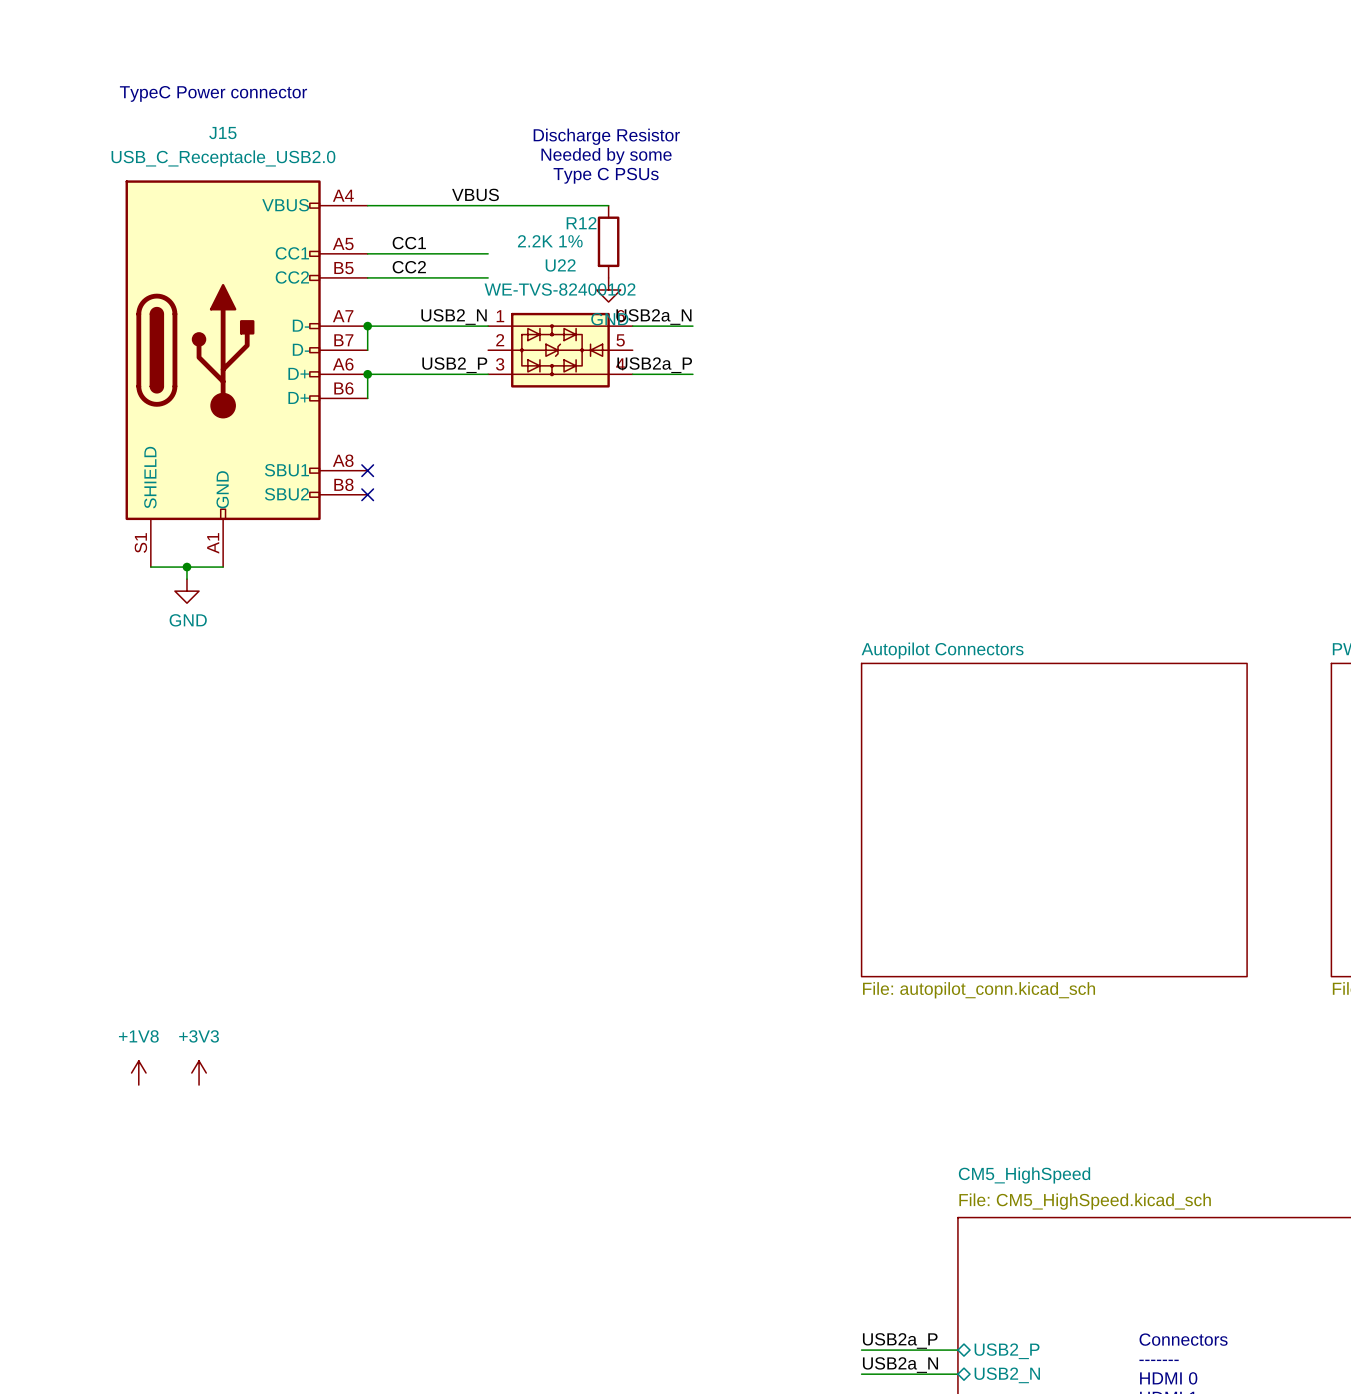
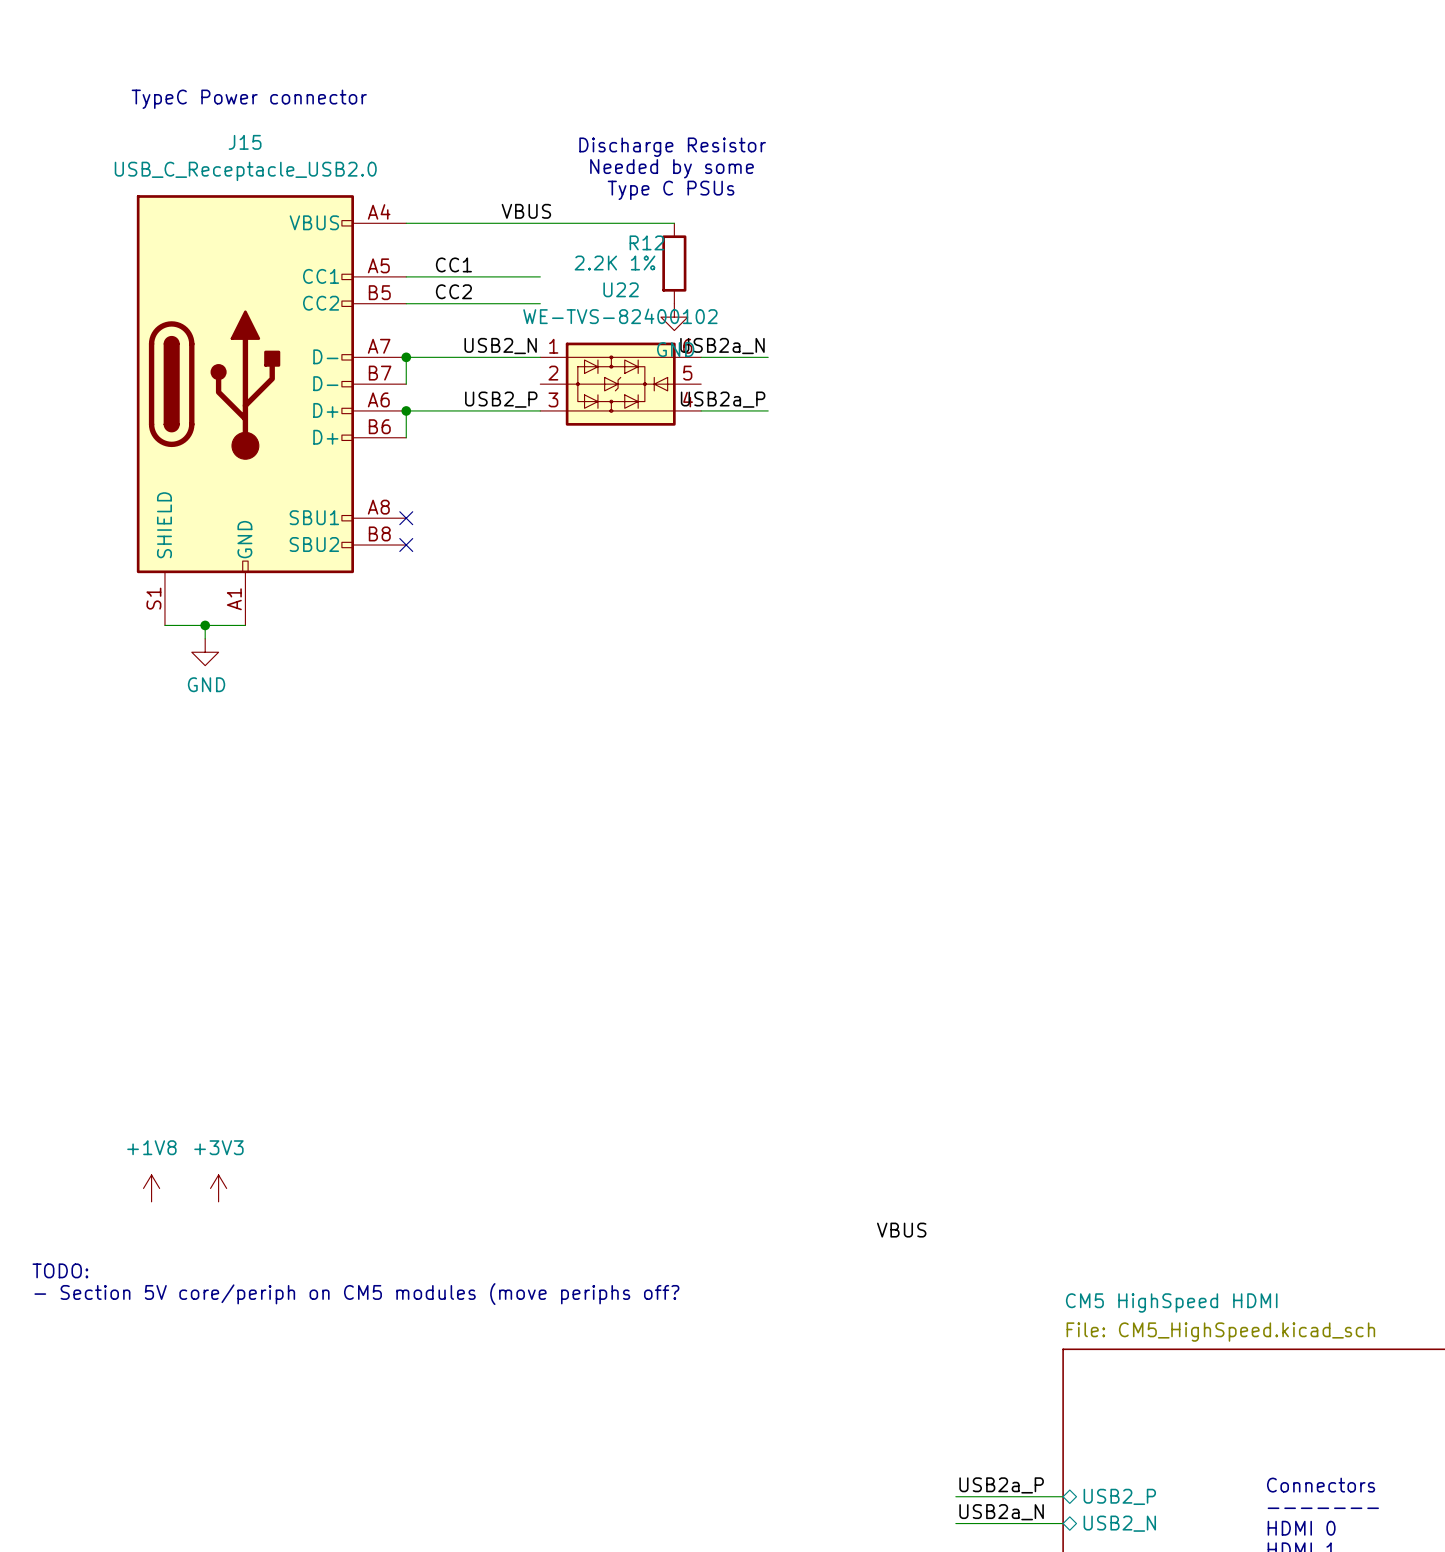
sheet Autopilot Connectors: File: autopilot_conn.kicad_sch (1054, 820) -> none
label: none -> VBUS (901, 1230)
text: none -> TODO: (60, 1270)
text: none -> - Section 5V core/periph on CM5 modules (move periphs off? (356, 1294)
sheet CM5_HighSpeed name: CM5_HighSpeed (1024, 1175) -> CM5 HighSpeed HDMI (1171, 1302)

